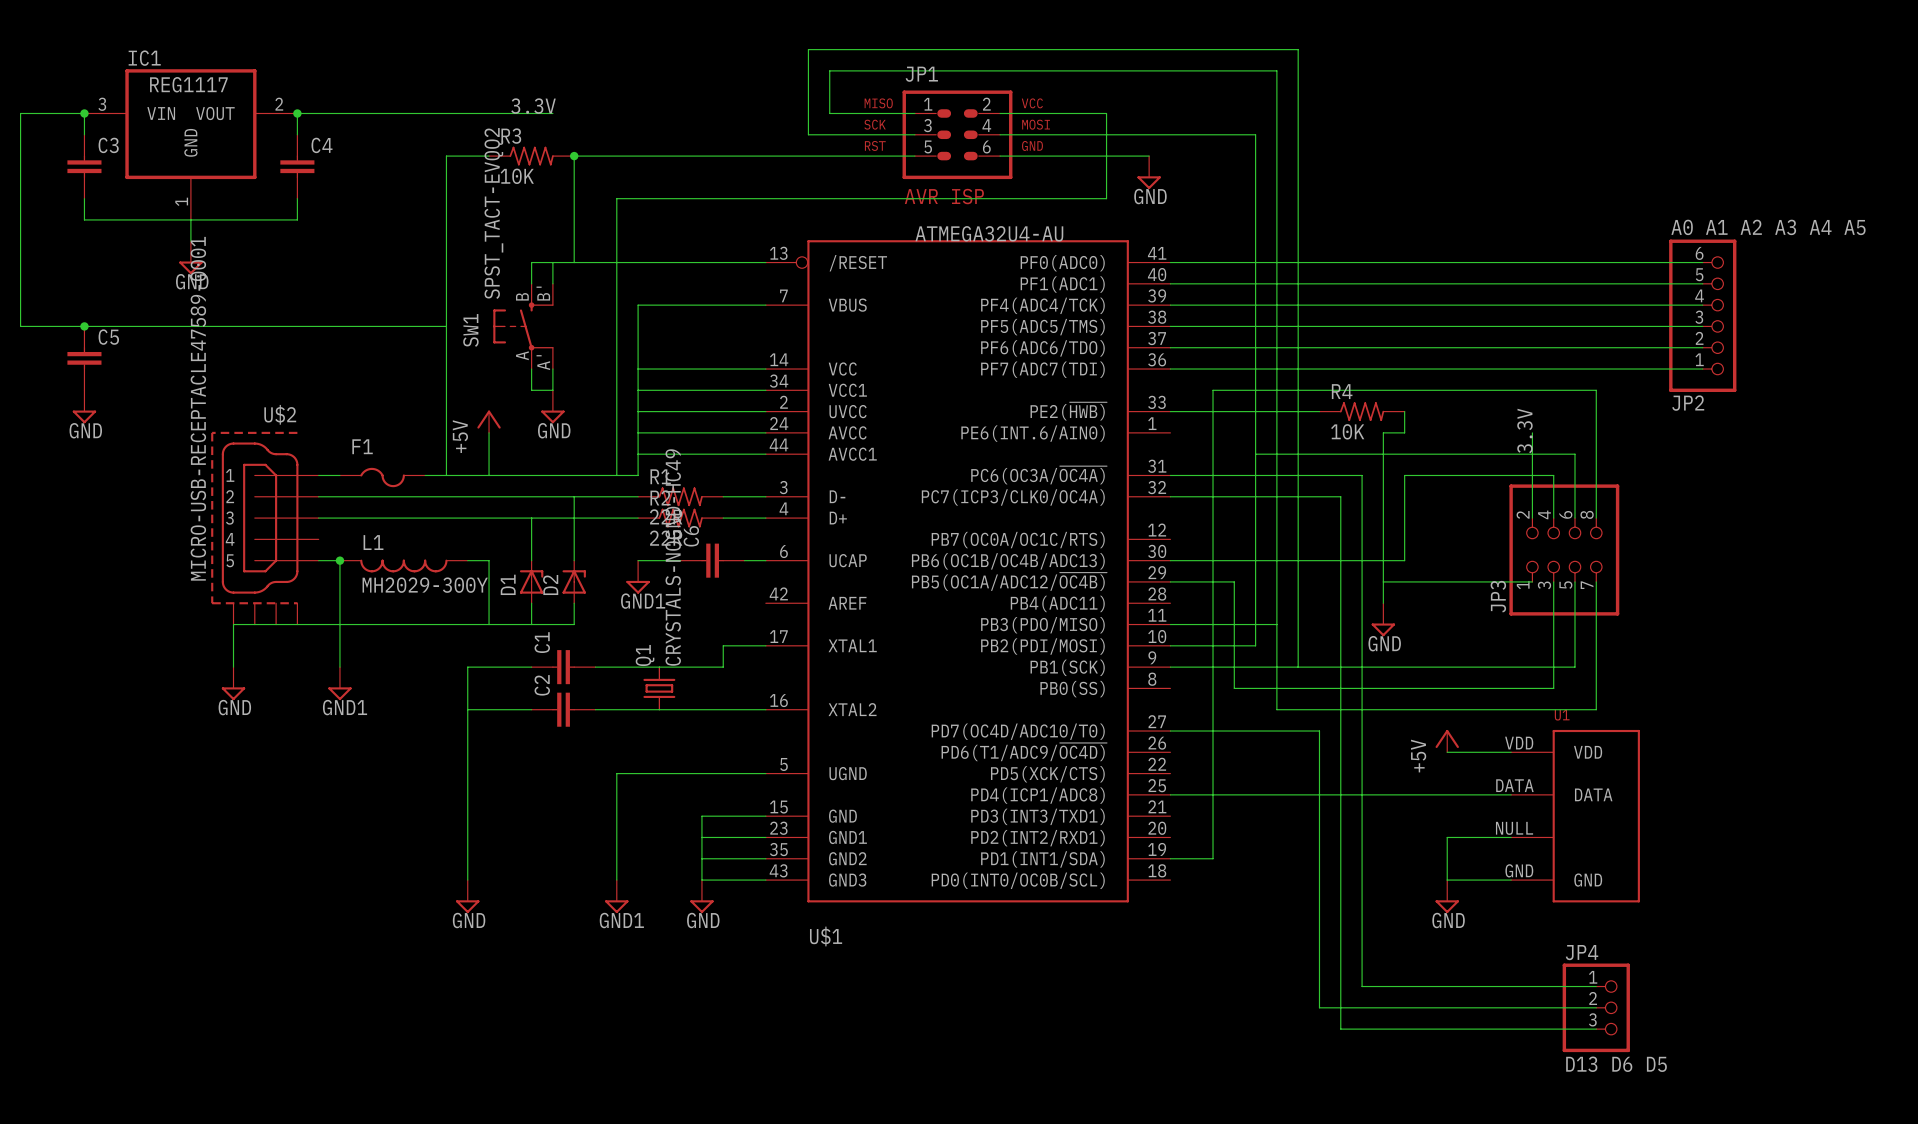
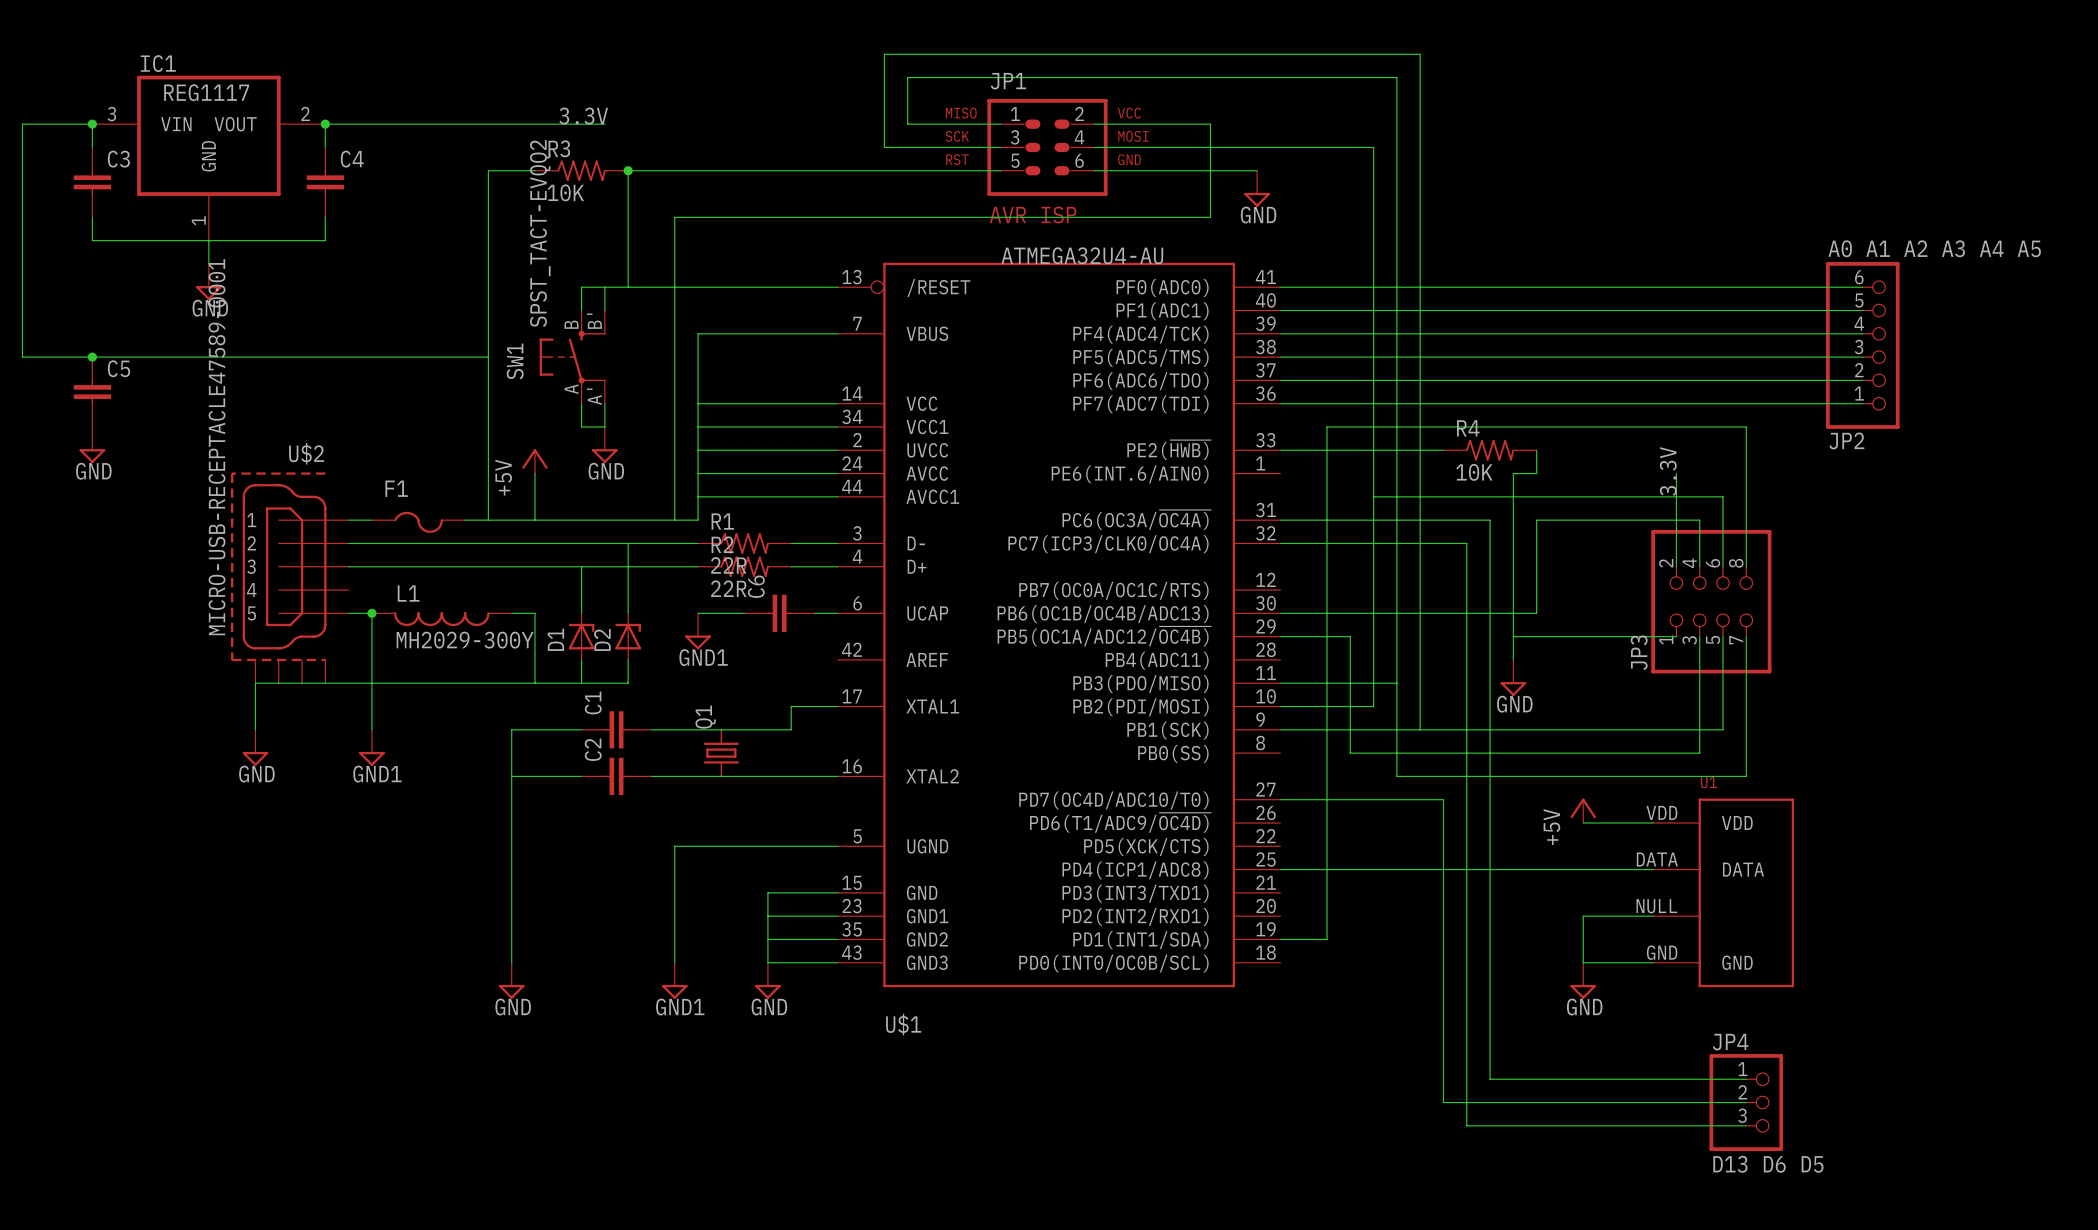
Q1 value: CRYSTALS-NOGND-HC49 (673, 557) -> none

